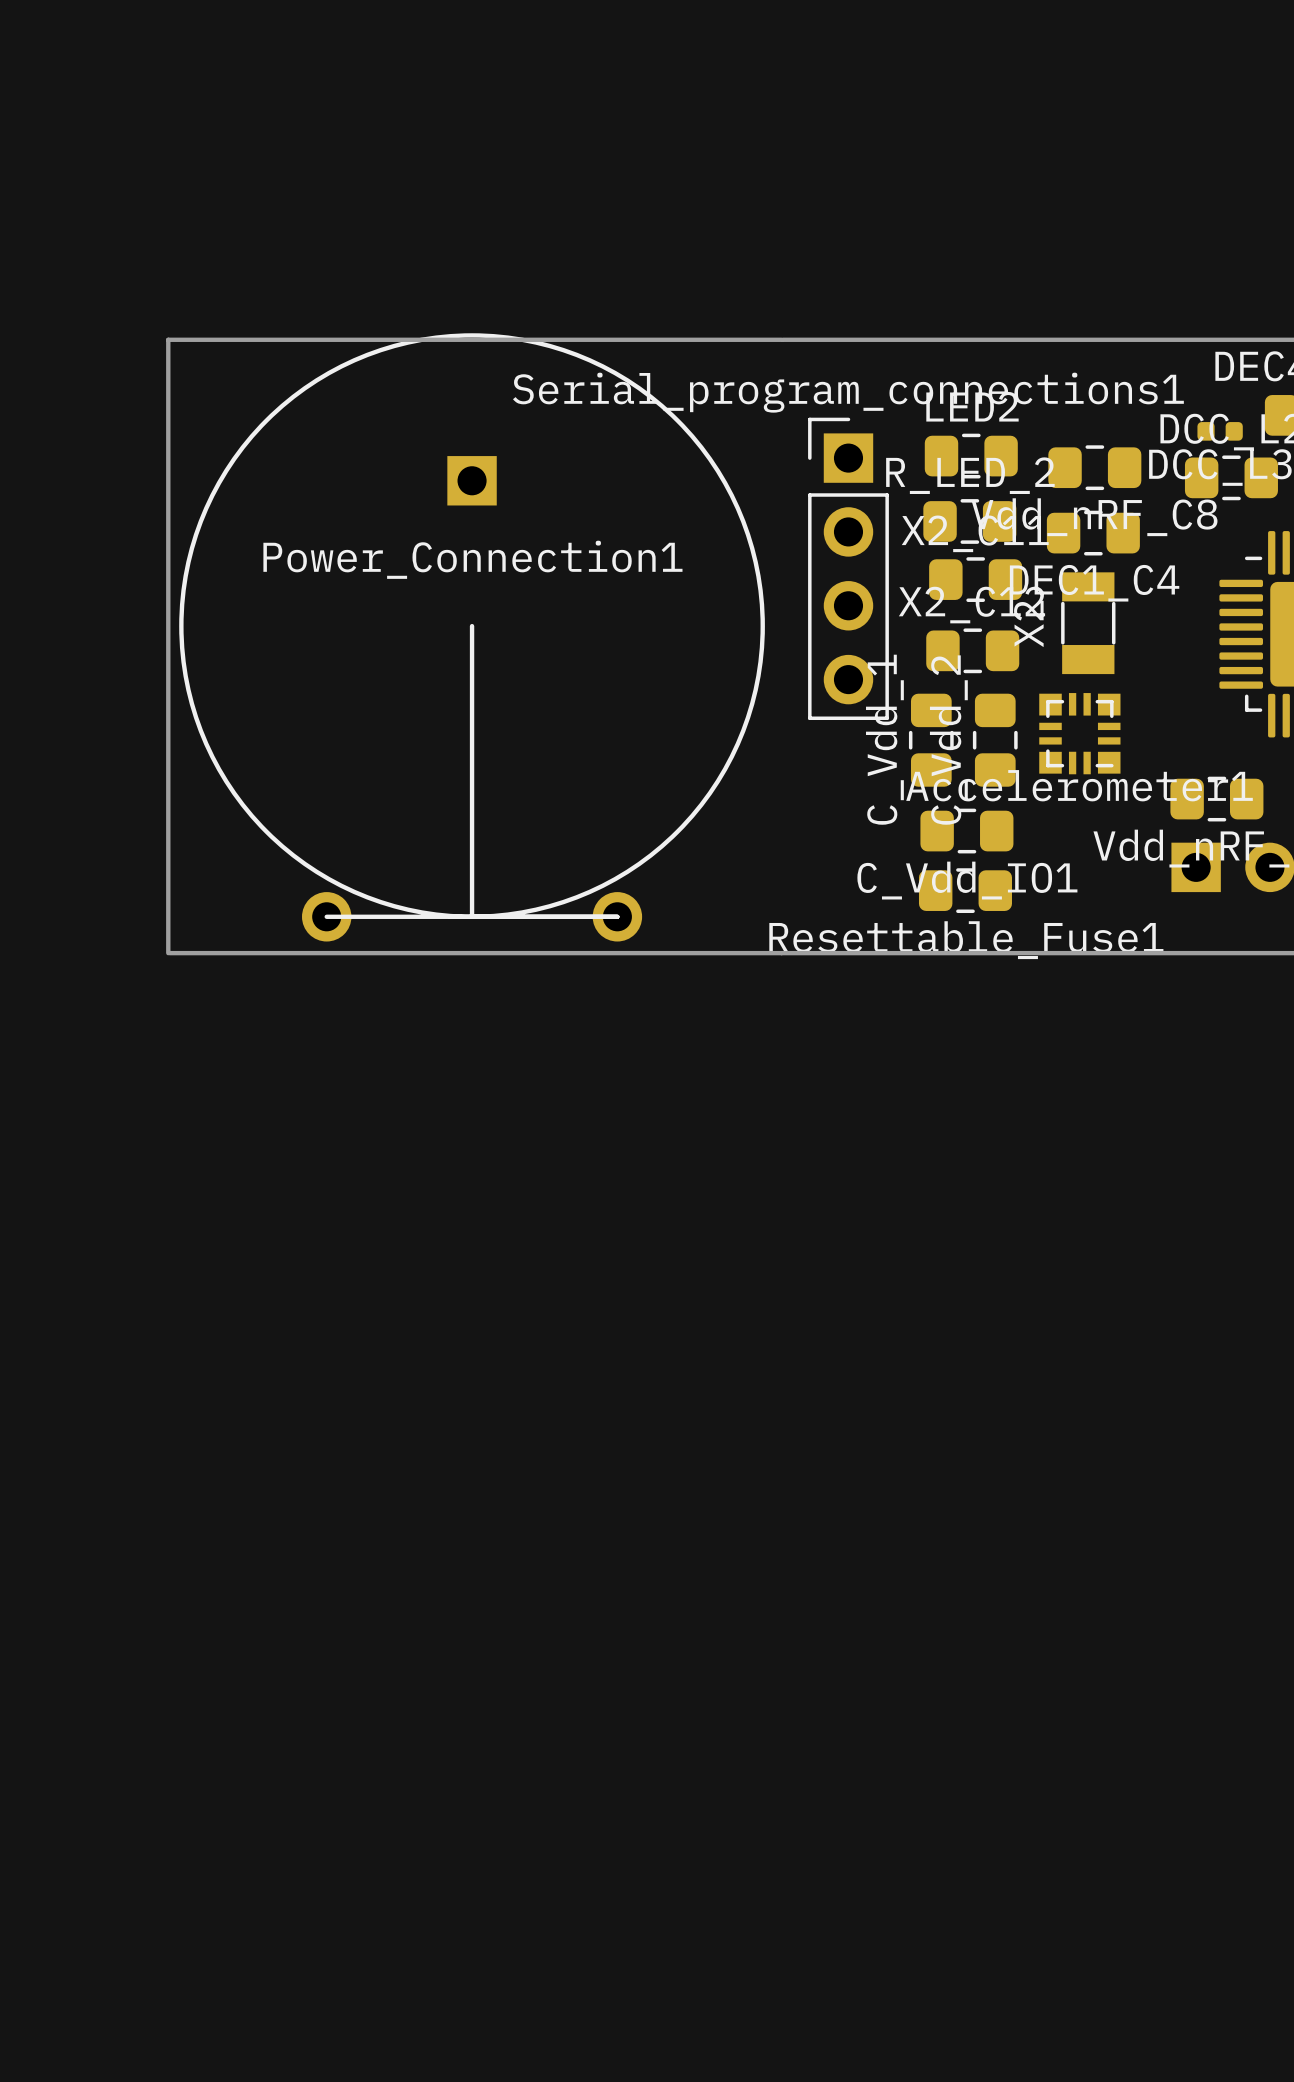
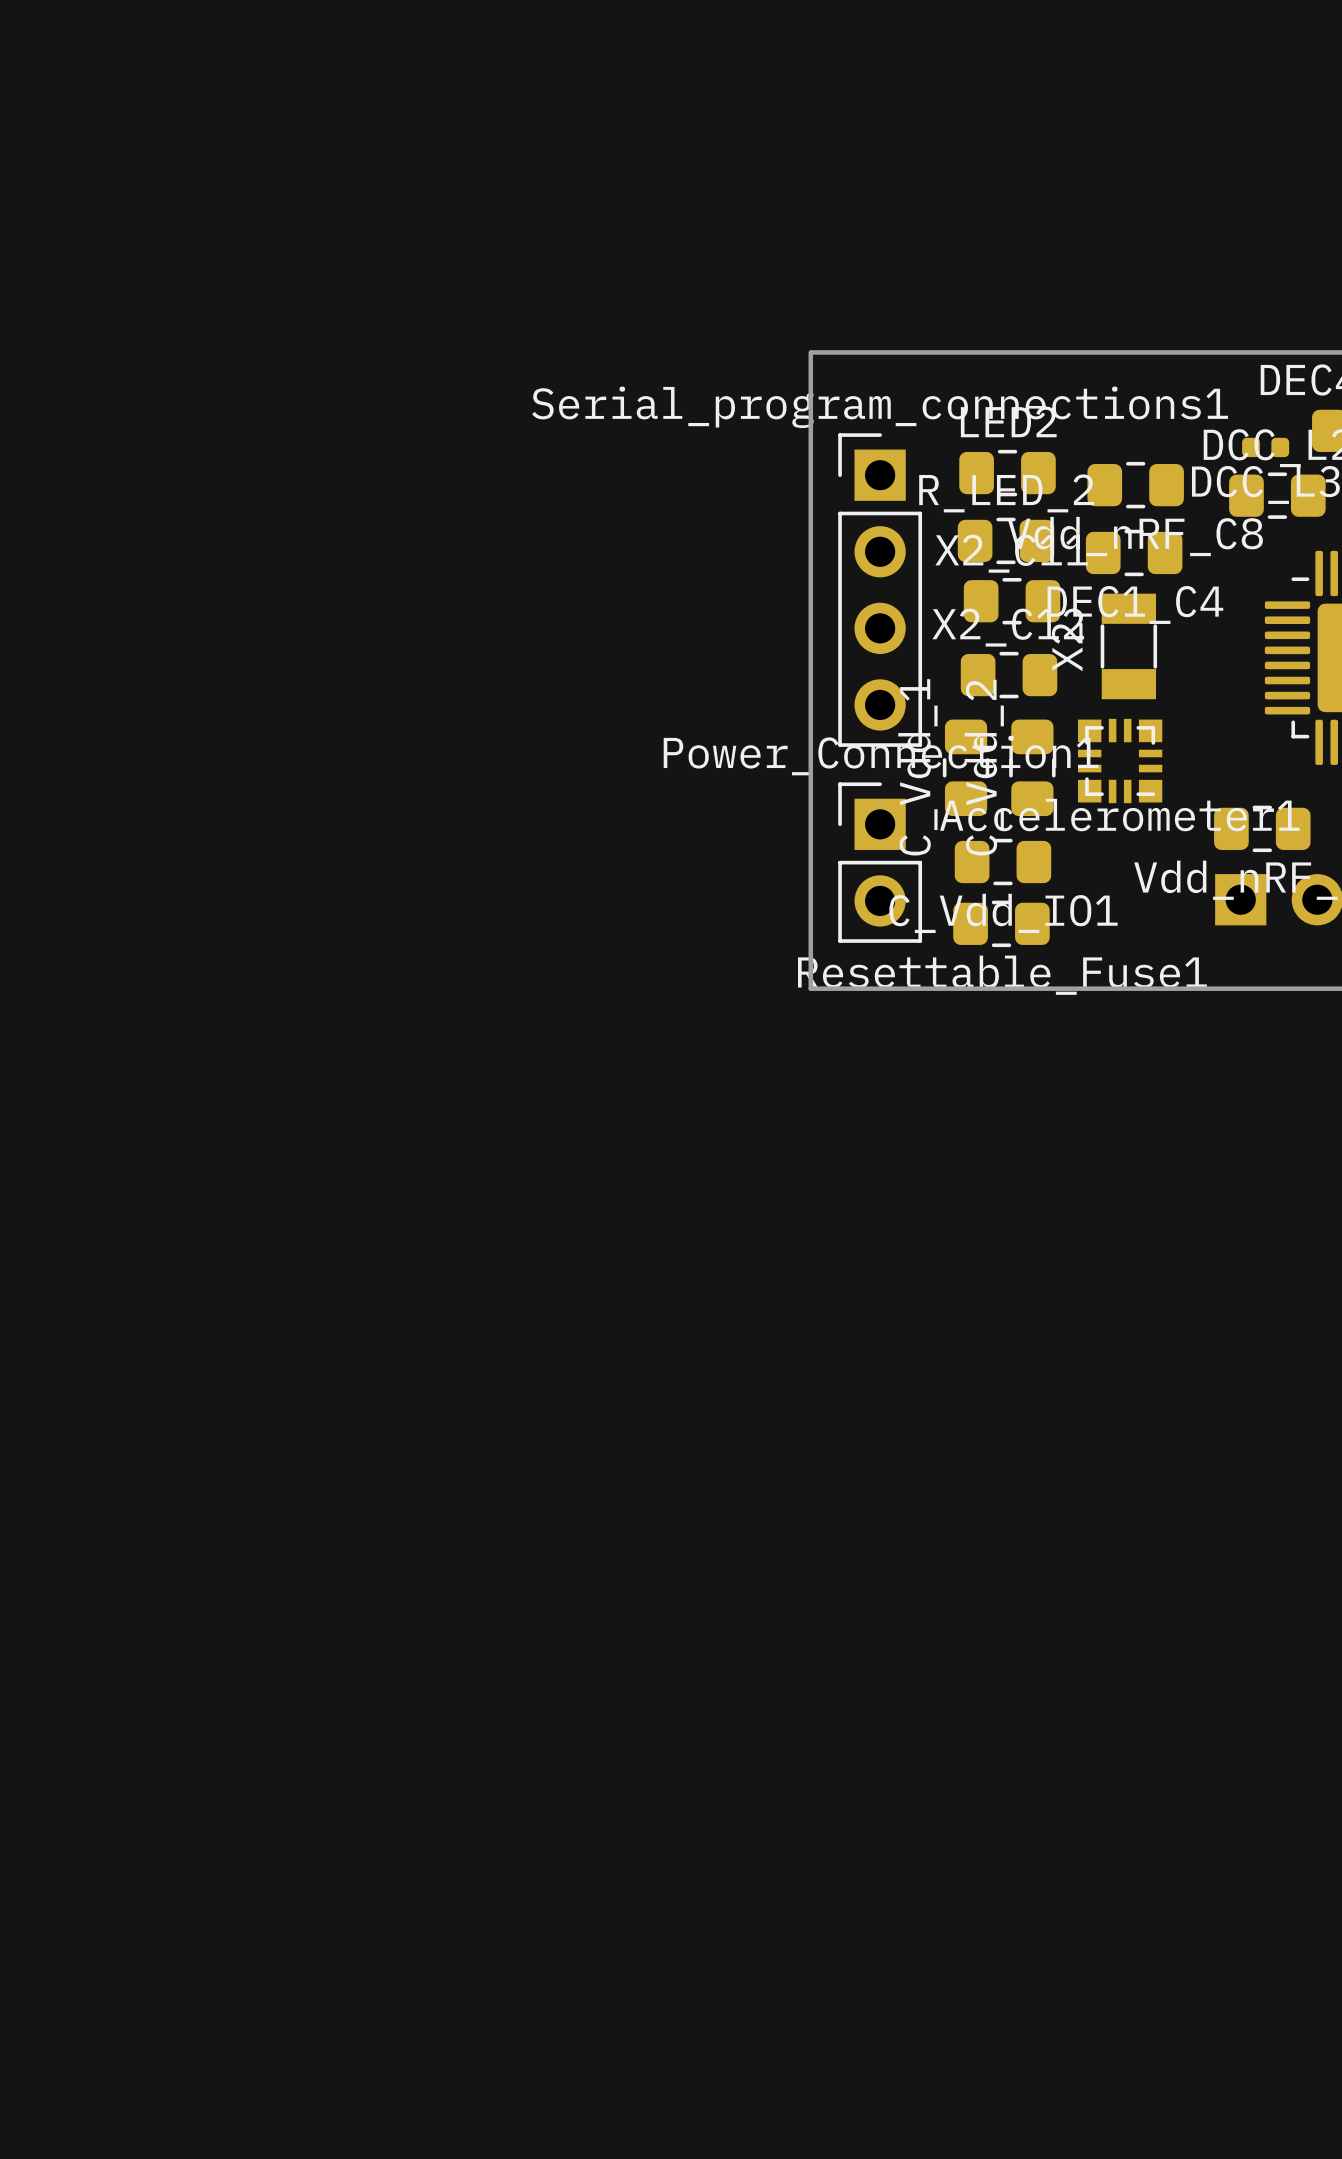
Power_Connection1 footprint: [179, 333, 765, 942] -> [838, 782, 923, 943]
board edge: (781, 339) (168, 339) (168, 953) -> (810, 352) (810, 988)
board edge: (169, 953) (781, 953) -> none

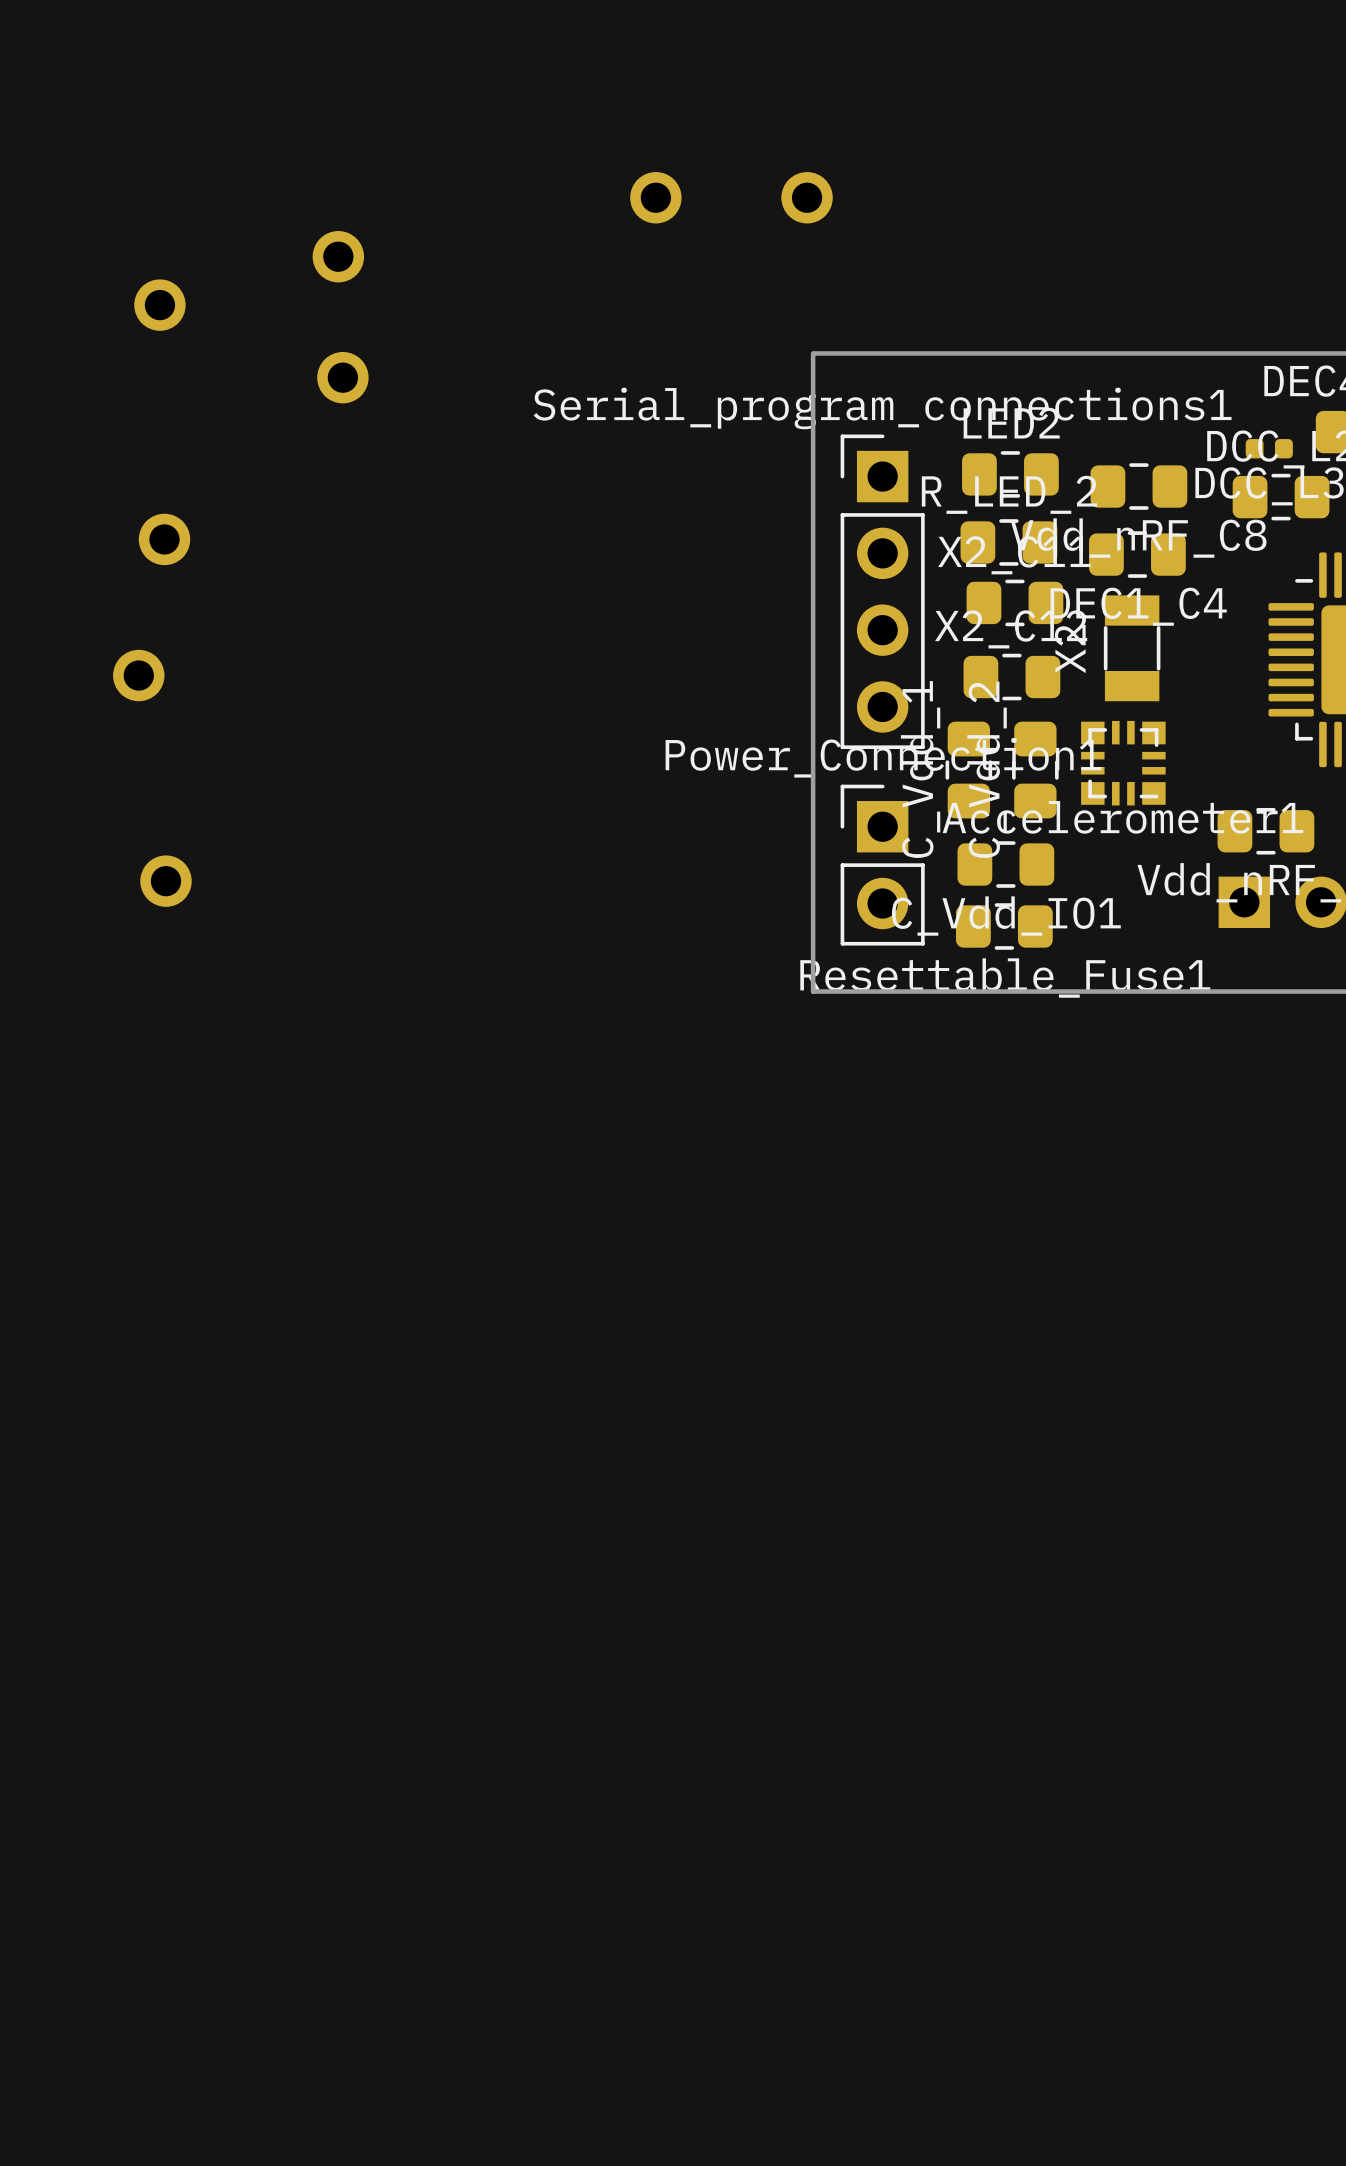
part: none -> (655, 197)
part: none -> (807, 197)
part: none -> (338, 256)
part: none -> (159, 305)
part: none -> (342, 377)
part: none -> (164, 539)
part: none -> (138, 675)
part: none -> (166, 881)

